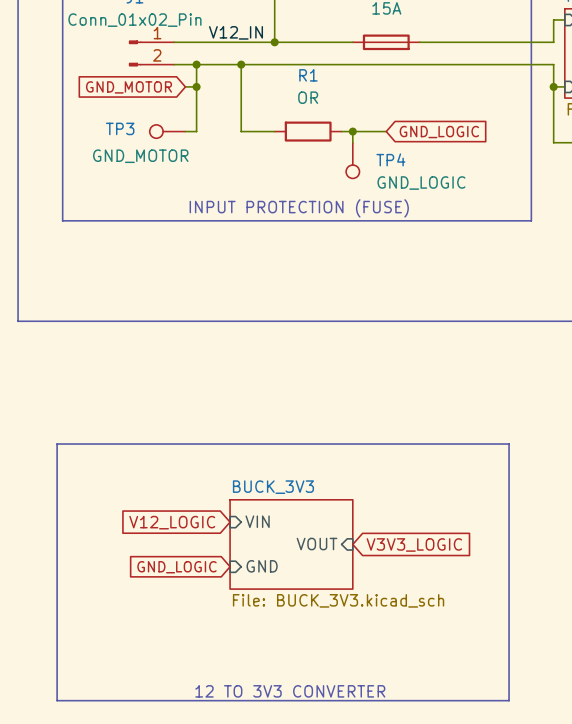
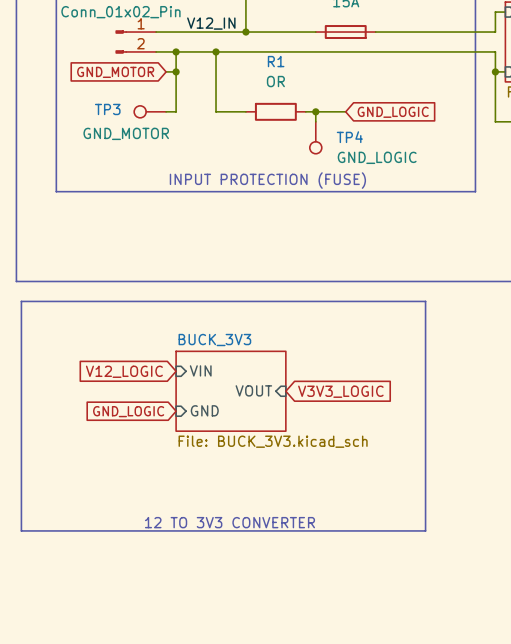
line: (57, 444) (509, 444) (509, 700) (57, 700) (57, 444) -> (21, 301) (425, 301) (425, 530) (21, 530) (21, 301)
sheet pin position: VIN (257, 521) -> VIN (200, 370)
global label position: V12_LOGIC (172, 522) -> V12_LOGIC (124, 371)
sheet BUCK_3V3 position: (291, 544) -> (230, 391)
sheet pin position: VOUT (317, 544) -> VOUT (253, 390)
global label position: V3V3_LOGIC (414, 544) -> V3V3_LOGIC (340, 391)
sheet pin position: GND (262, 566) -> GND (204, 410)
global label position: GND_LOGIC (176, 567) -> GND_LOGIC (128, 411)
text position: 12 TO 3V3 CONVERTER (290, 691) -> 12 TO 3V3 CONVERTER (229, 522)

